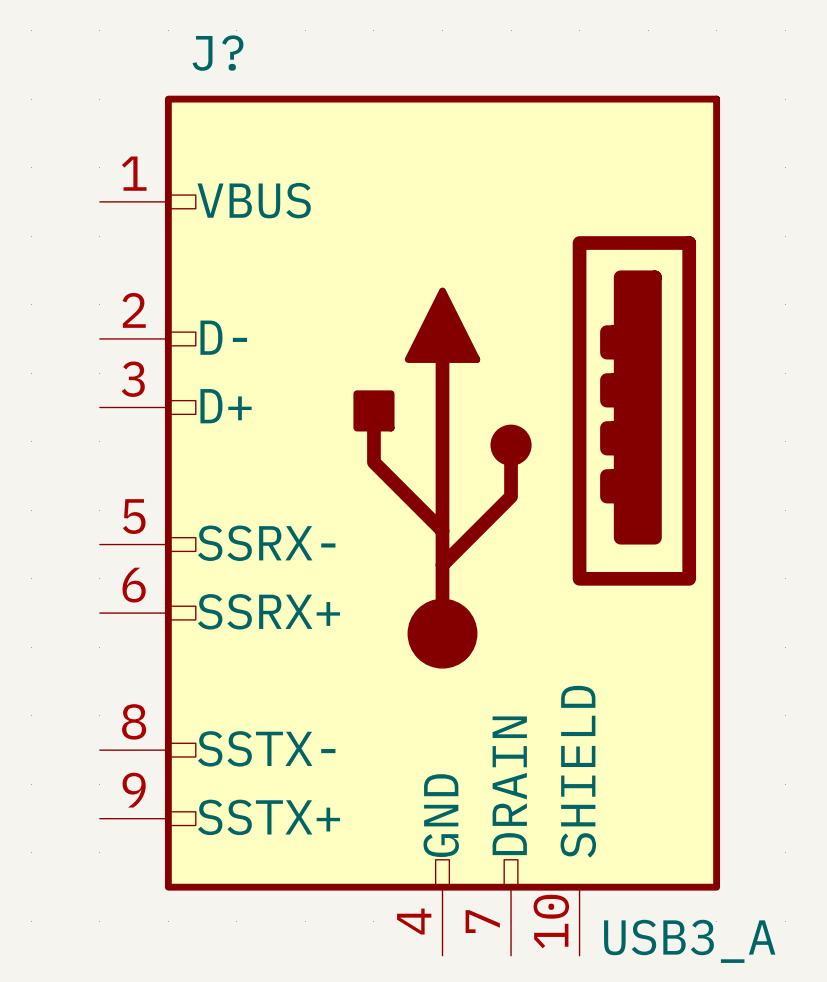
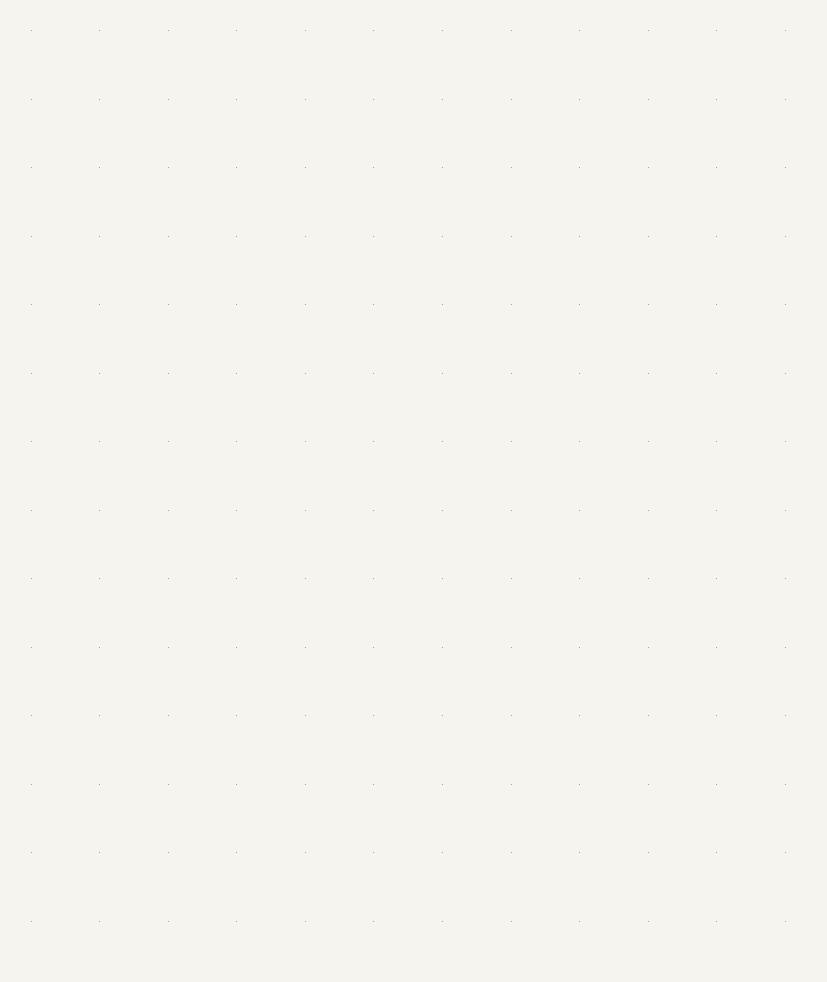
J?: USB3_A (409, 525) -> none

